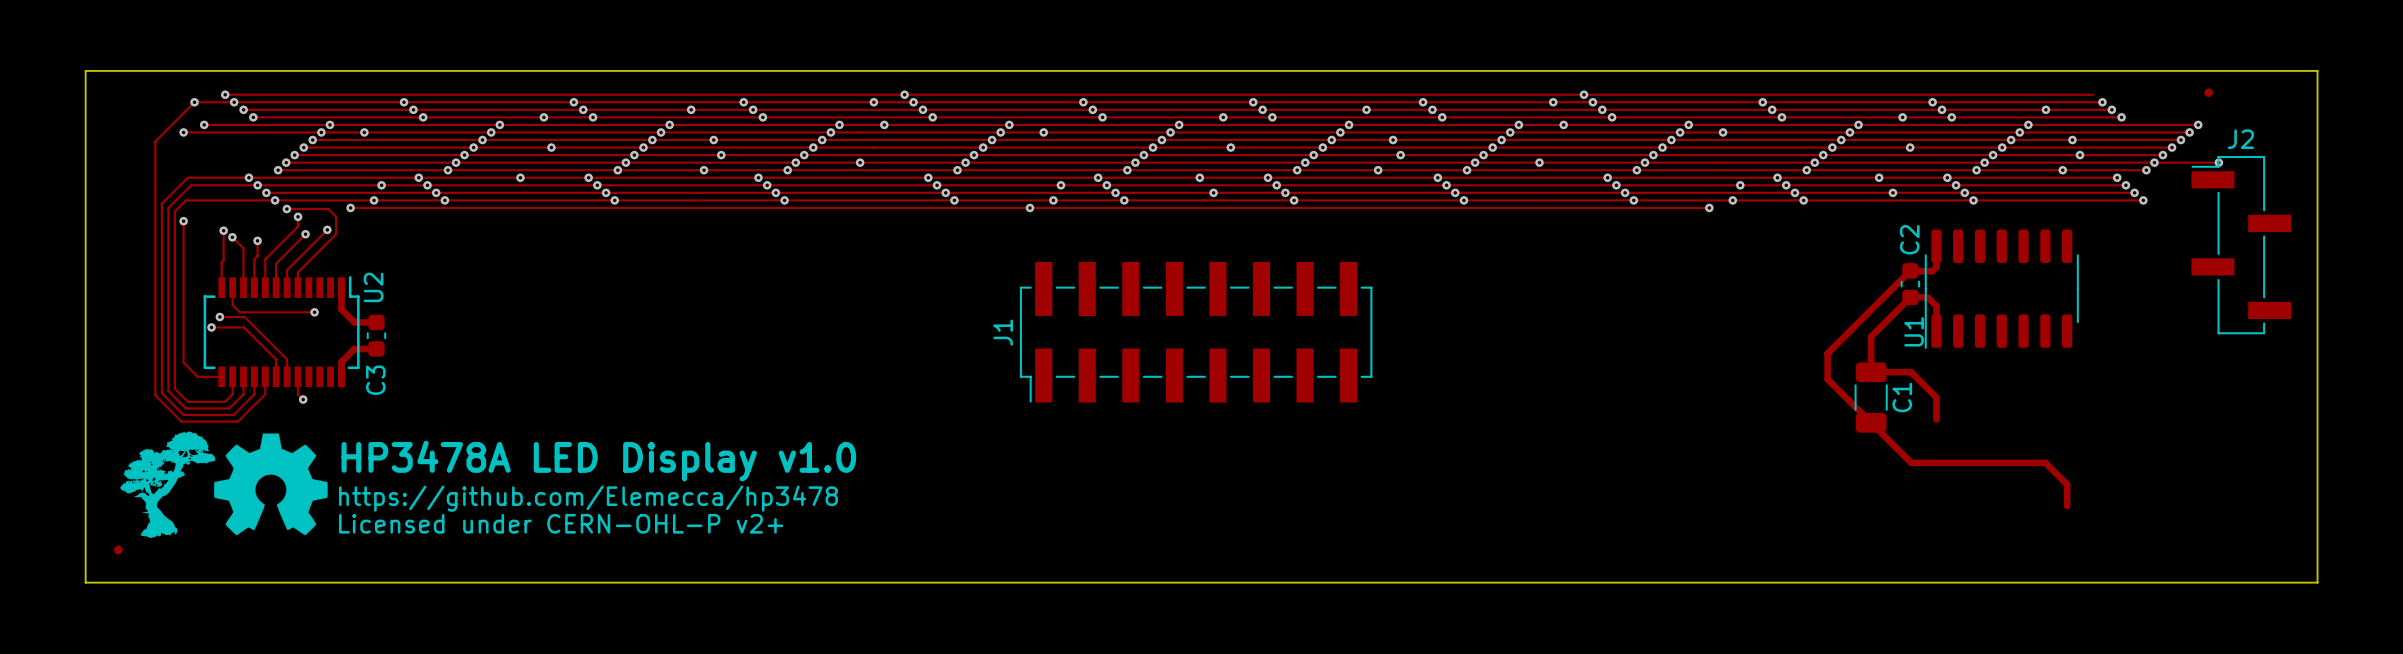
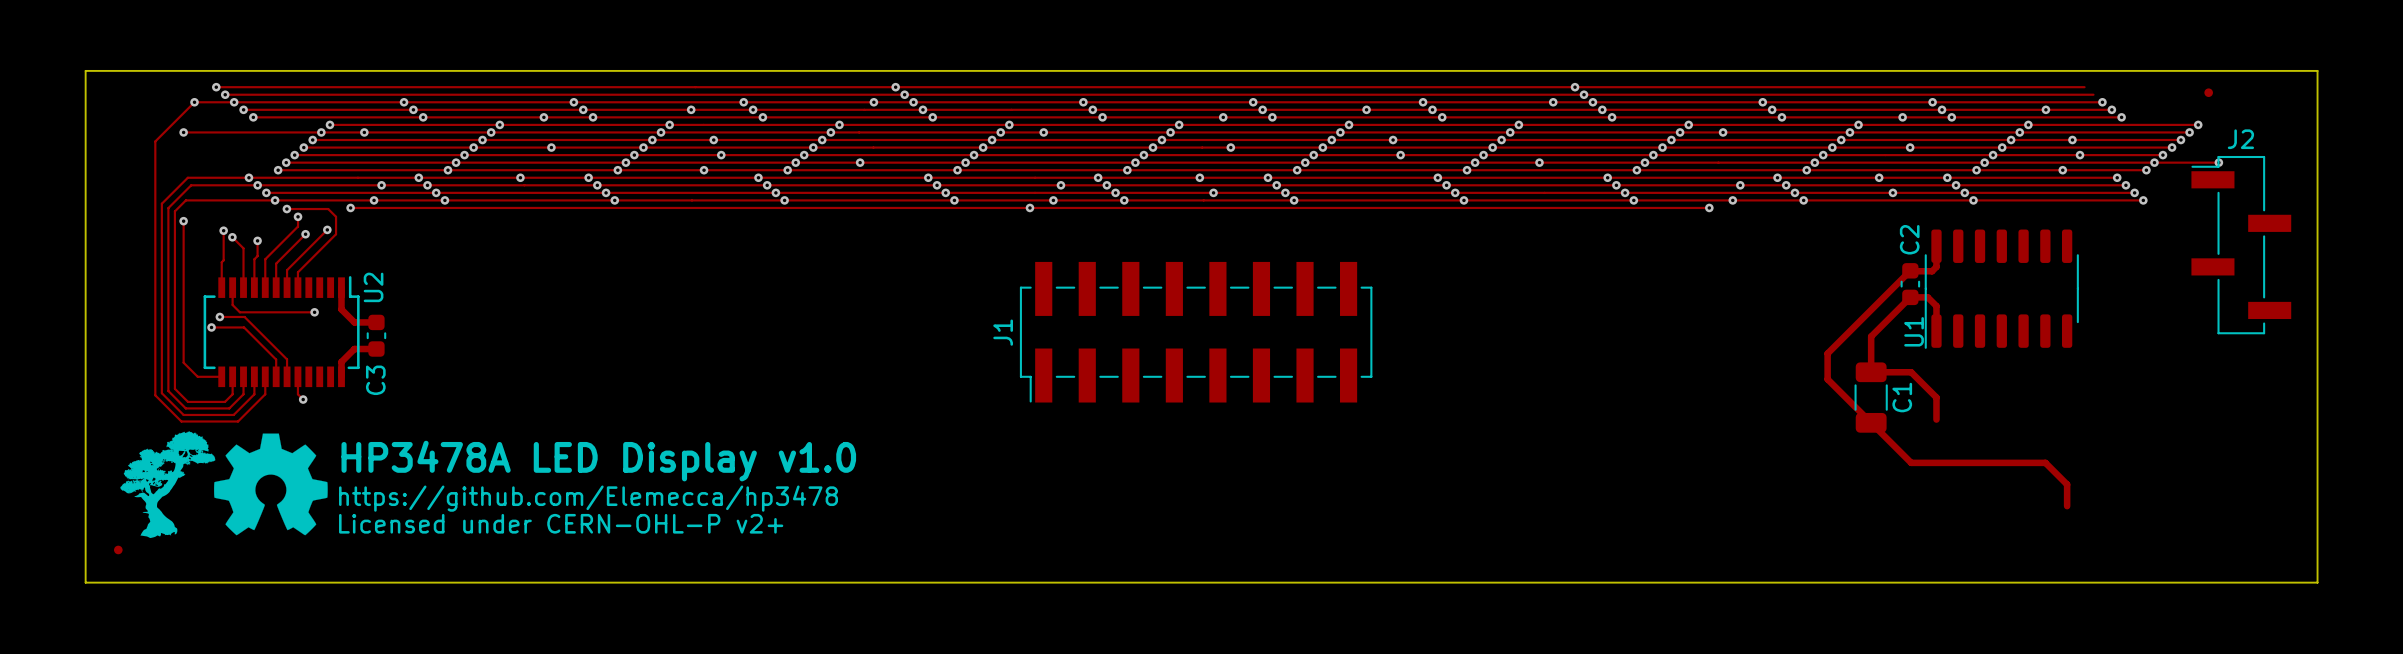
track: none -> (216, 87) (2084, 87)
track: (204, 124) (329, 124) -> none
via position: (204, 124) -> (216, 87)
via position: (884, 124) -> (895, 87)
via position: (1563, 124) -> (1575, 87)
via: (1378, 170) -> none

